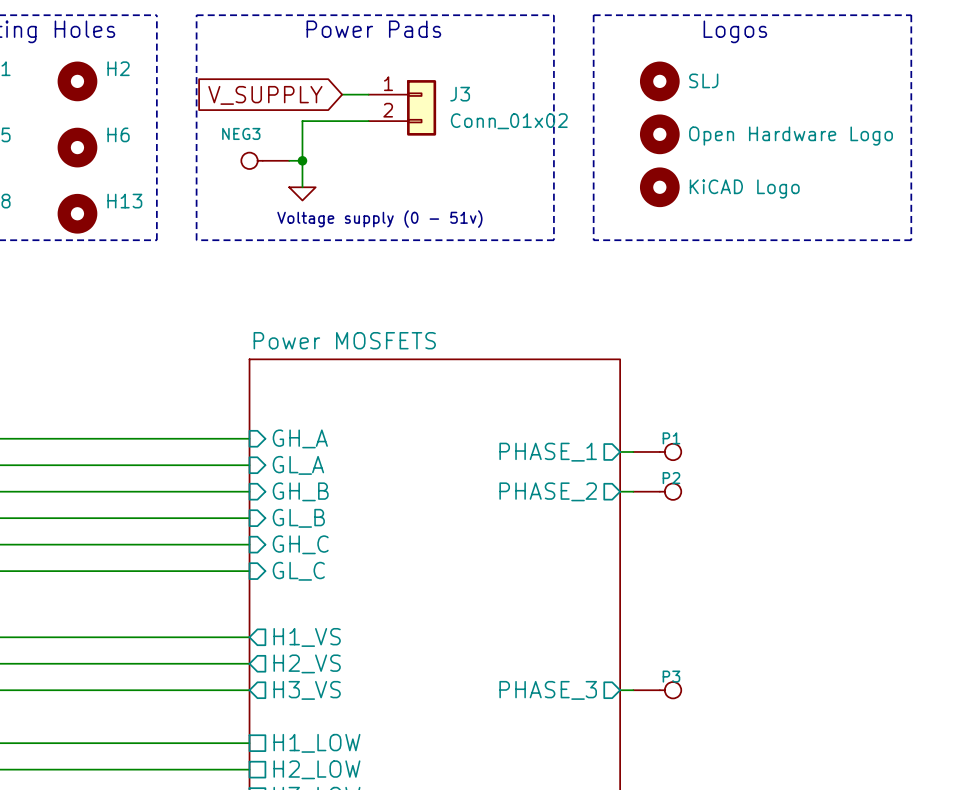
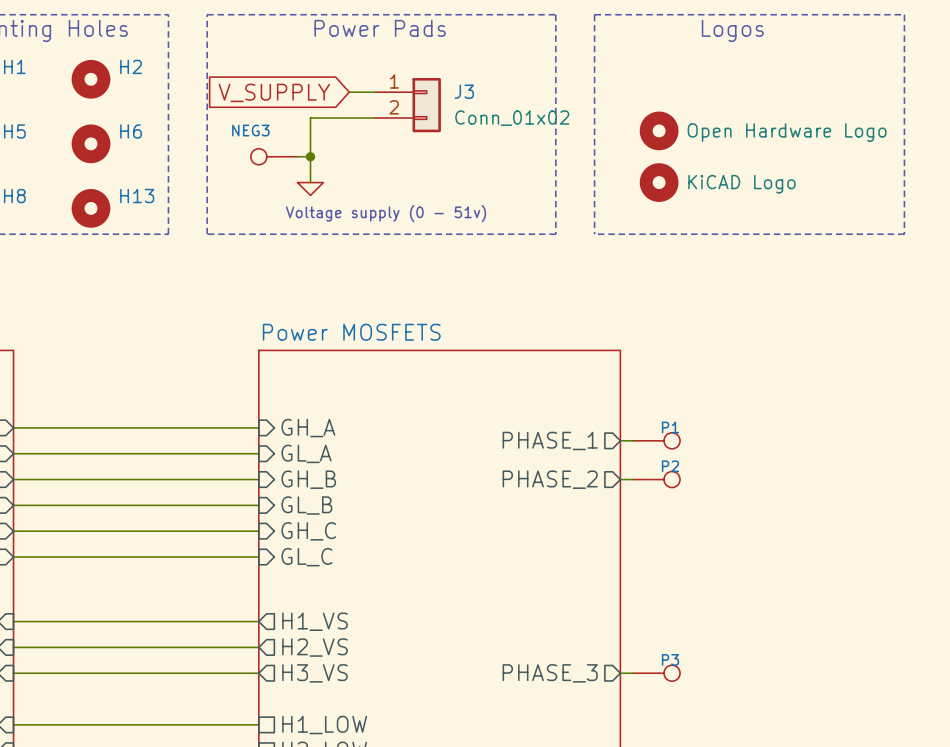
part: SLJ (659, 81) -> none

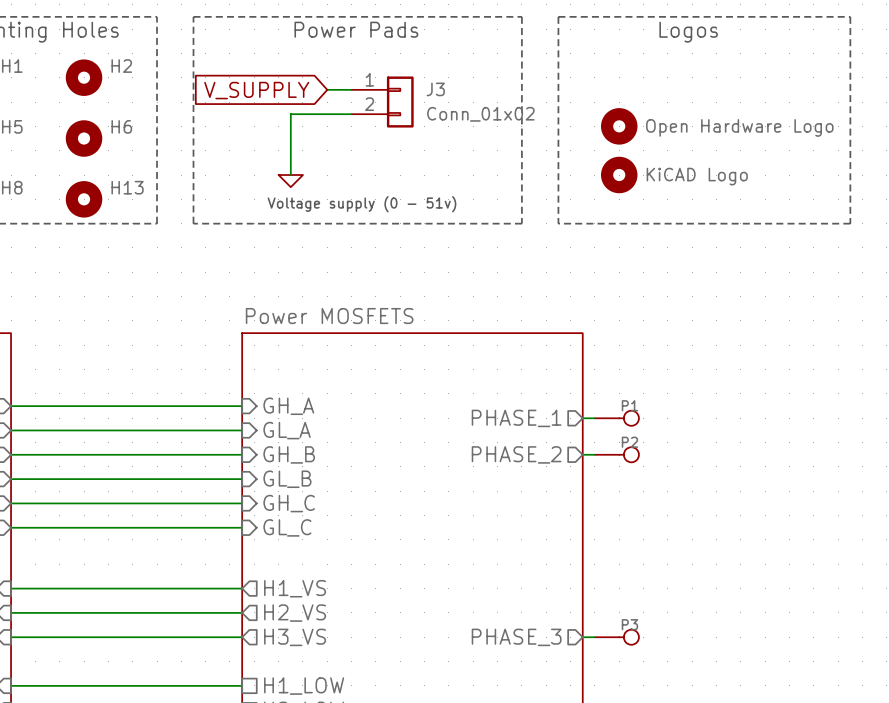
NEG3: (274, 156) -> none
wire: (297, 156) (310, 156) -> none
junction: (310, 156) -> none

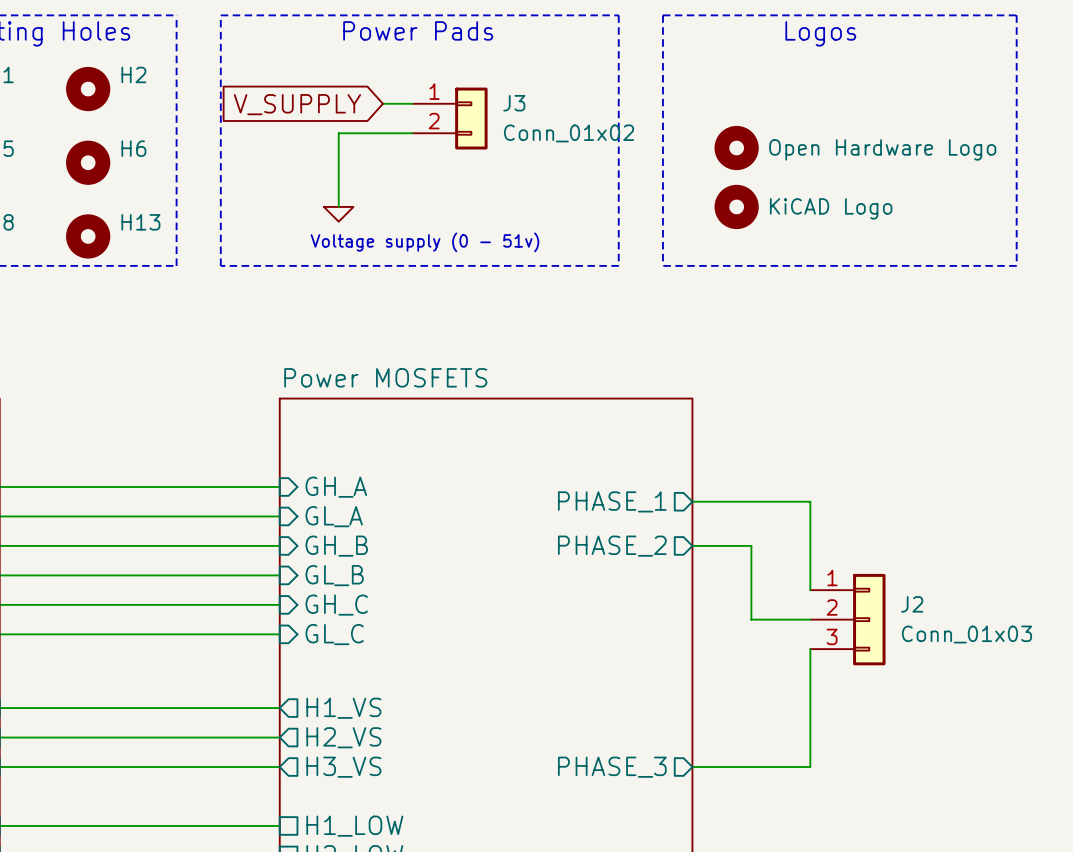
wire: none -> (707, 501) (810, 501) (810, 590)
P1: (616, 418) -> none
wire: none -> (707, 545) (751, 545) (751, 619) (810, 619)
P2: (616, 454) -> none
J2: none -> Conn_01x03 (847, 619)
wire: none -> (810, 649) (810, 767) (707, 767)
P3: (616, 637) -> none

